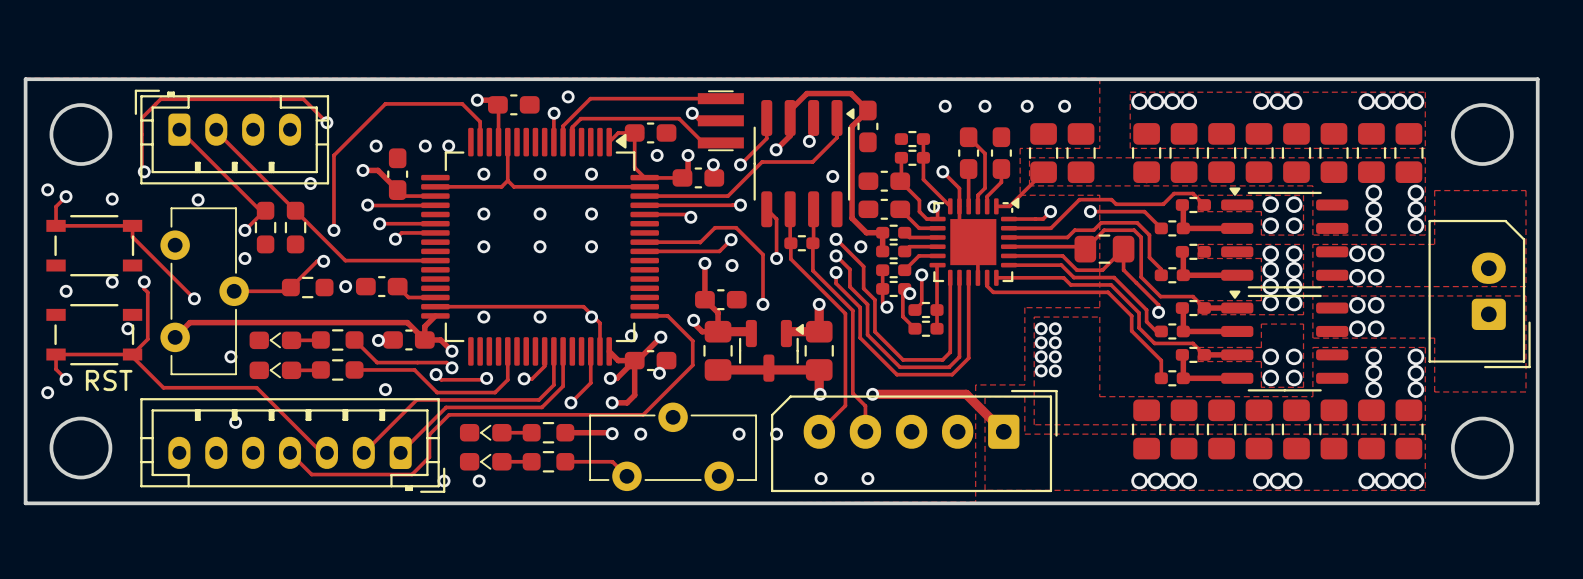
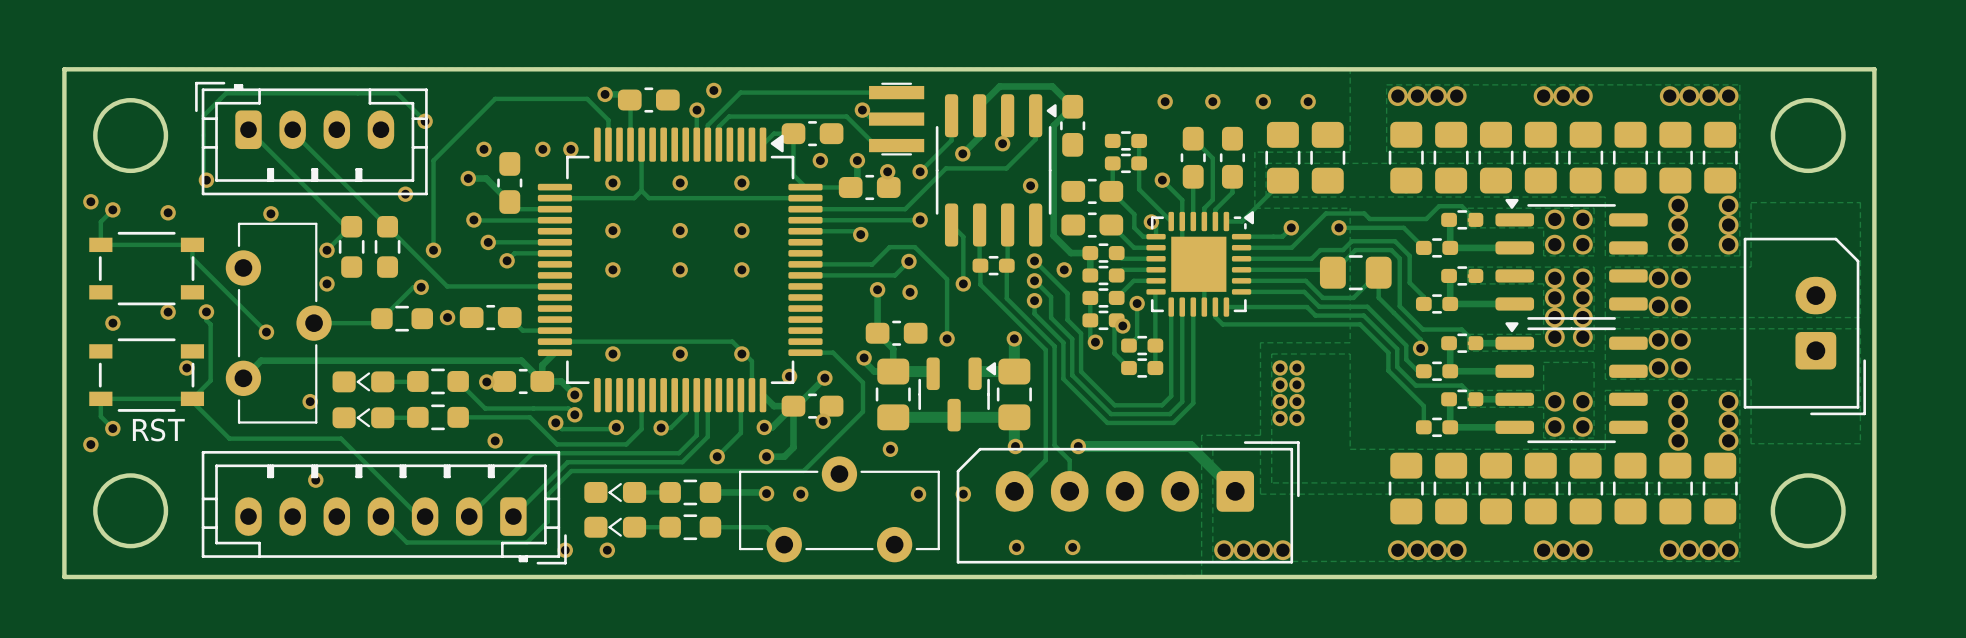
via: none -> (890, 449)
via: none -> (1224, 550)
via: none -> (1243, 550)
via: none -> (1263, 550)
via: none -> (1282, 550)

